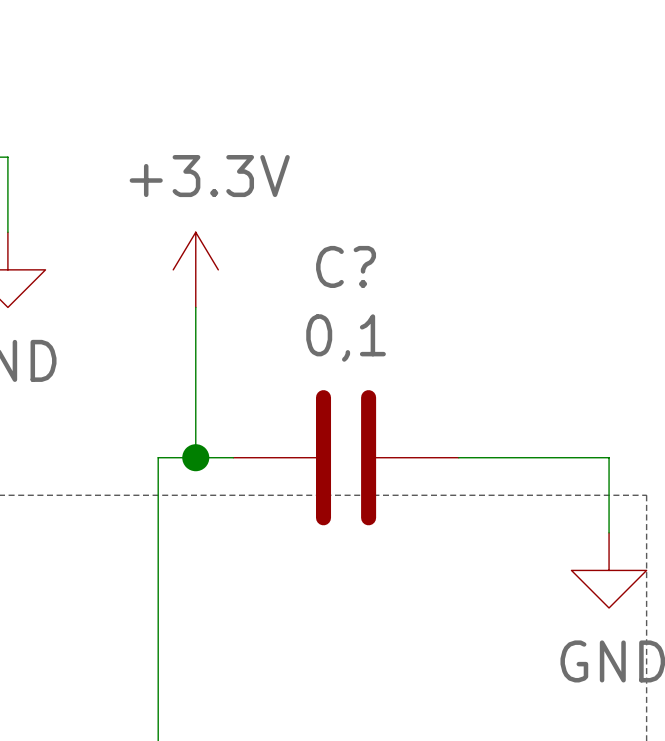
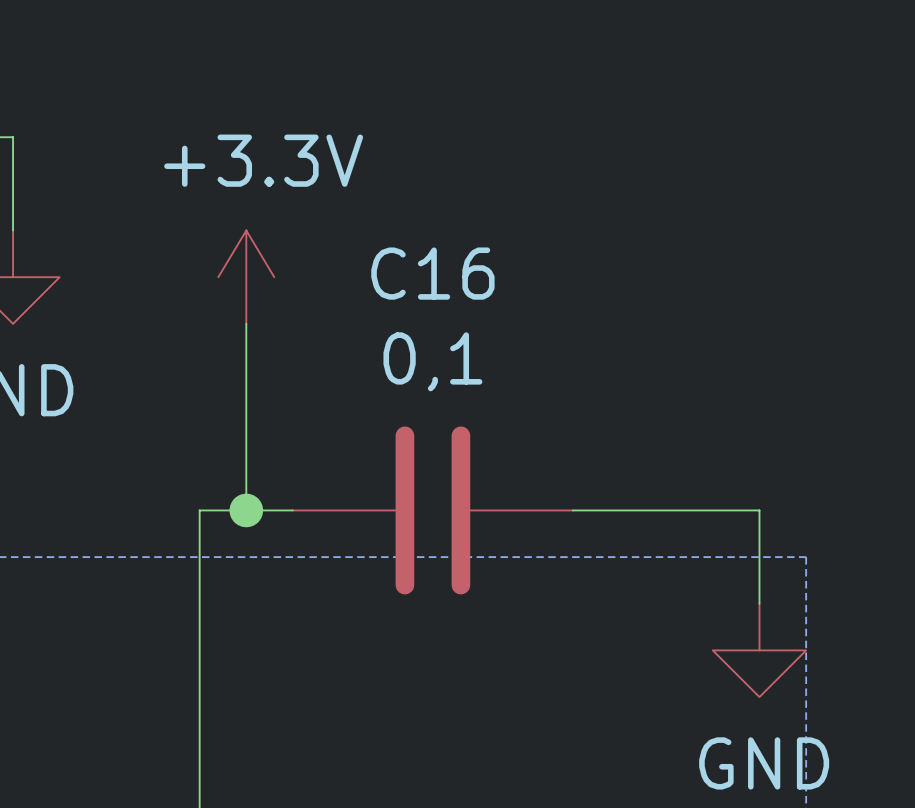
C? name: C? (346, 266) -> C16 (432, 273)

